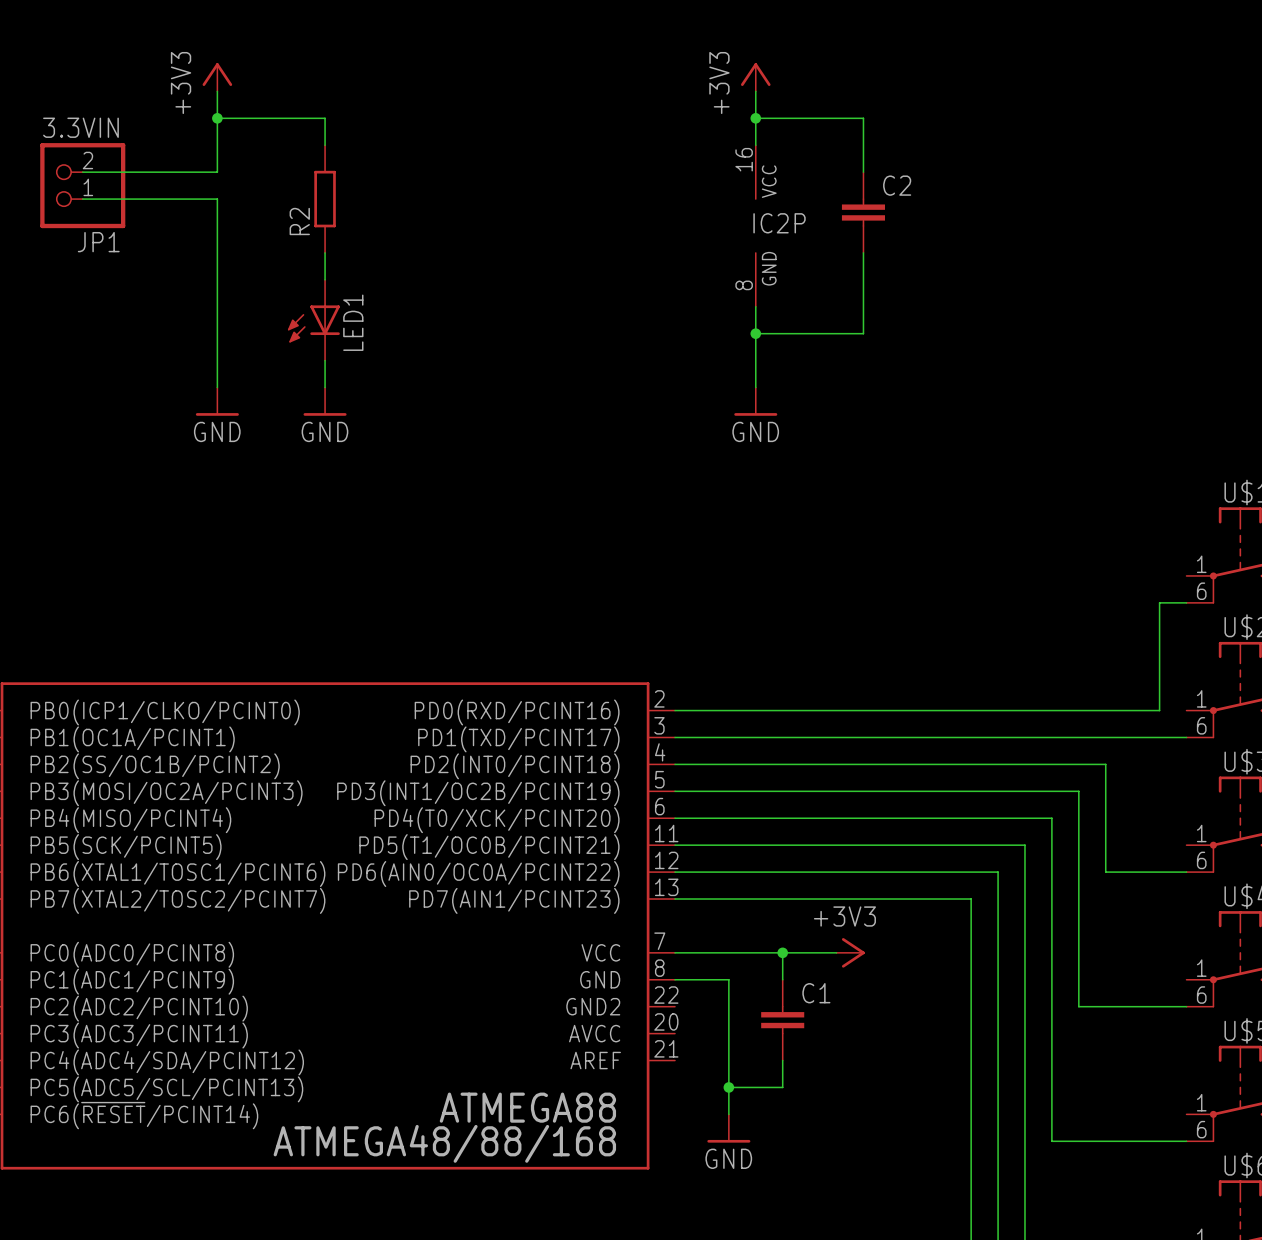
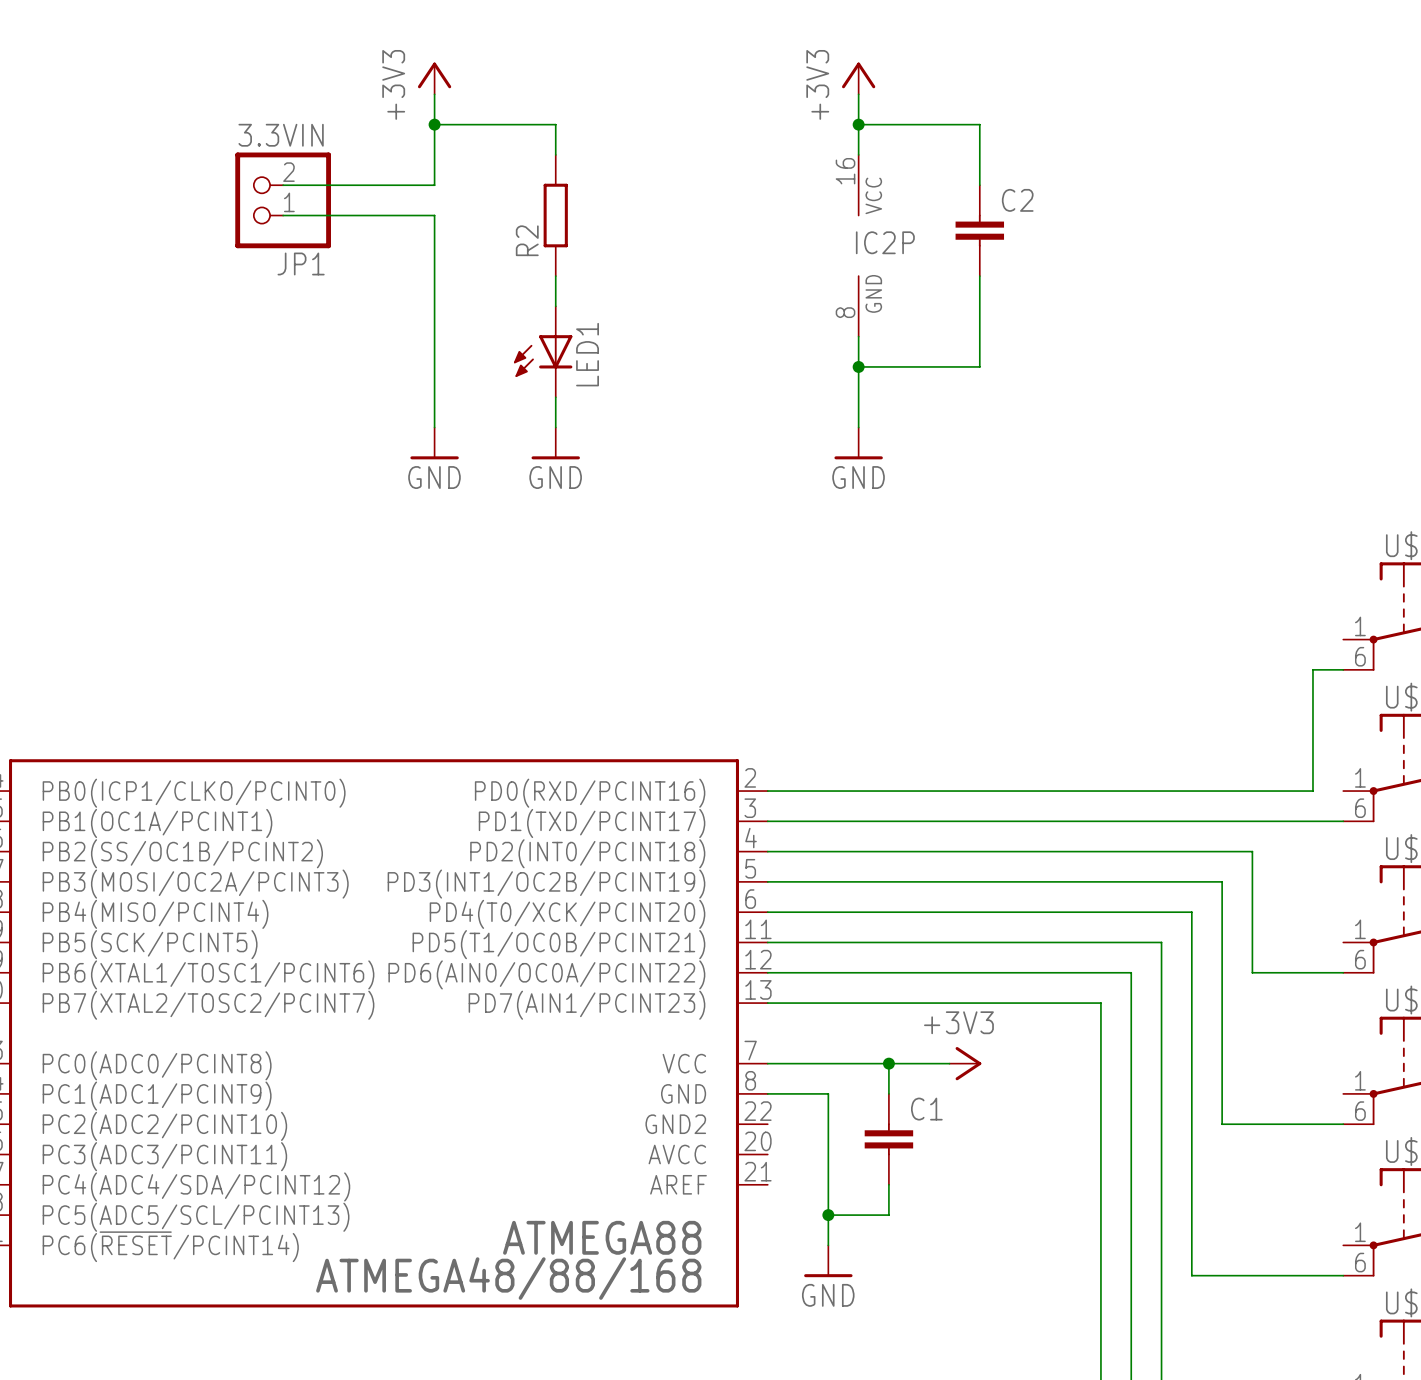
power symbol position: +3V3 (217, 77) -> +3V3 (434, 78)
wire: (217, 91) (217, 172) (82, 172) -> (434, 94) (434, 185) (283, 185)
wire: (217, 118) (325, 118) (325, 145) -> (434, 124) (555, 124) (555, 154)
junction: (217, 118) -> none
junction: none -> (434, 124)
JP1 position: (82, 185) -> (283, 200)
wire: (82, 199) (217, 199) (217, 387) -> (283, 215) (434, 215) (434, 427)
R2 position: (325, 199) -> (555, 215)
wire: (325, 252) (325, 279) -> (555, 276) (555, 306)
LED1 position: (313, 320) -> (543, 351)
wire: (325, 360) (325, 387) -> (555, 397) (555, 427)
power symbol: GND (217, 401) -> none
power symbol position: GND (325, 401) -> GND (434, 443)
power symbol: none -> GND (555, 443)

